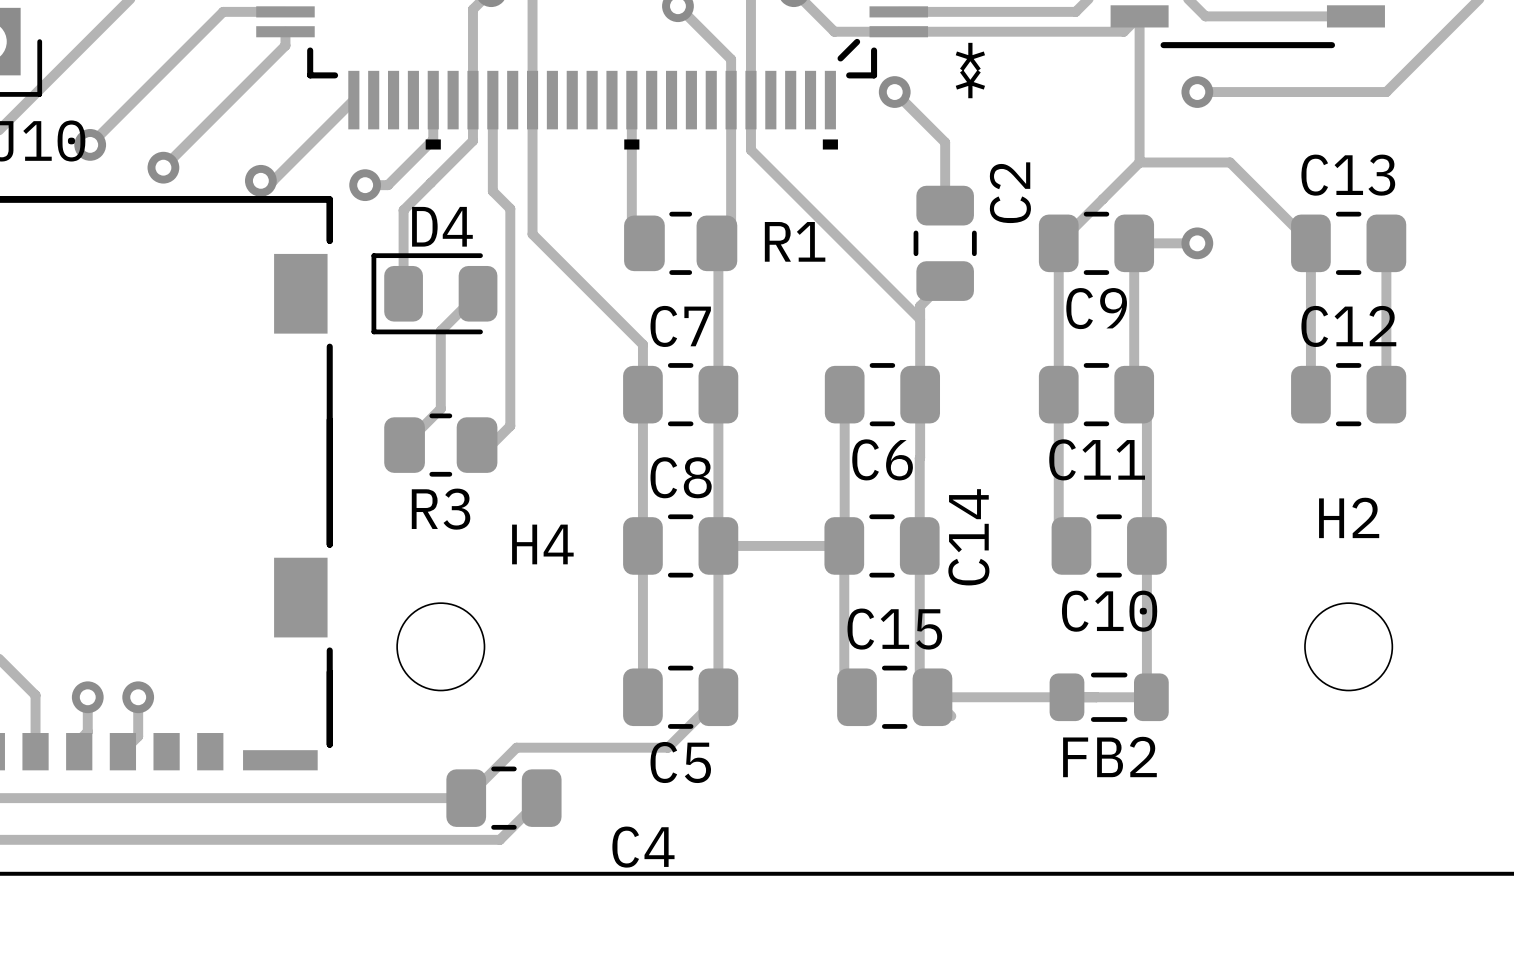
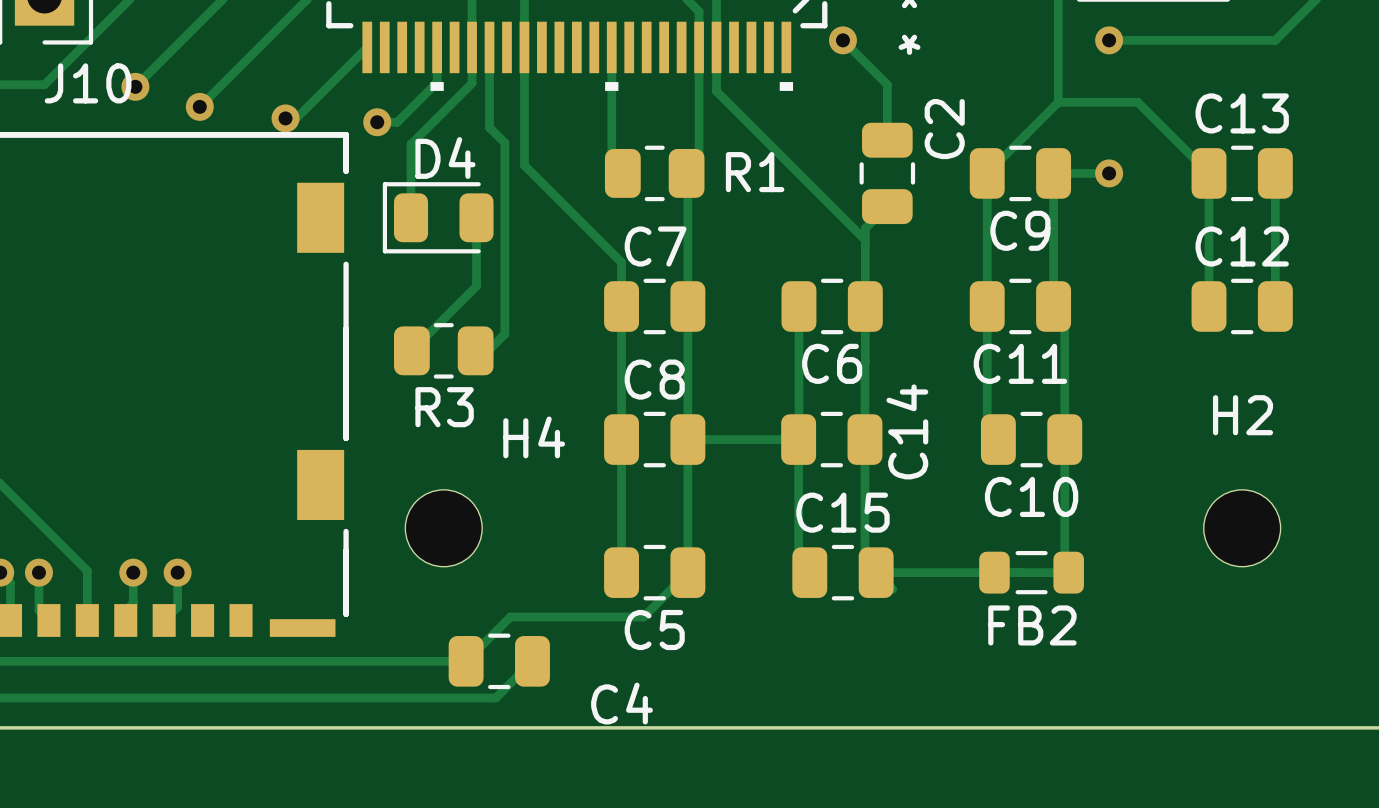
track: (478, 293) (440, 331) (440, 408) -> (476, 217) (476, 286) (443, 318)

